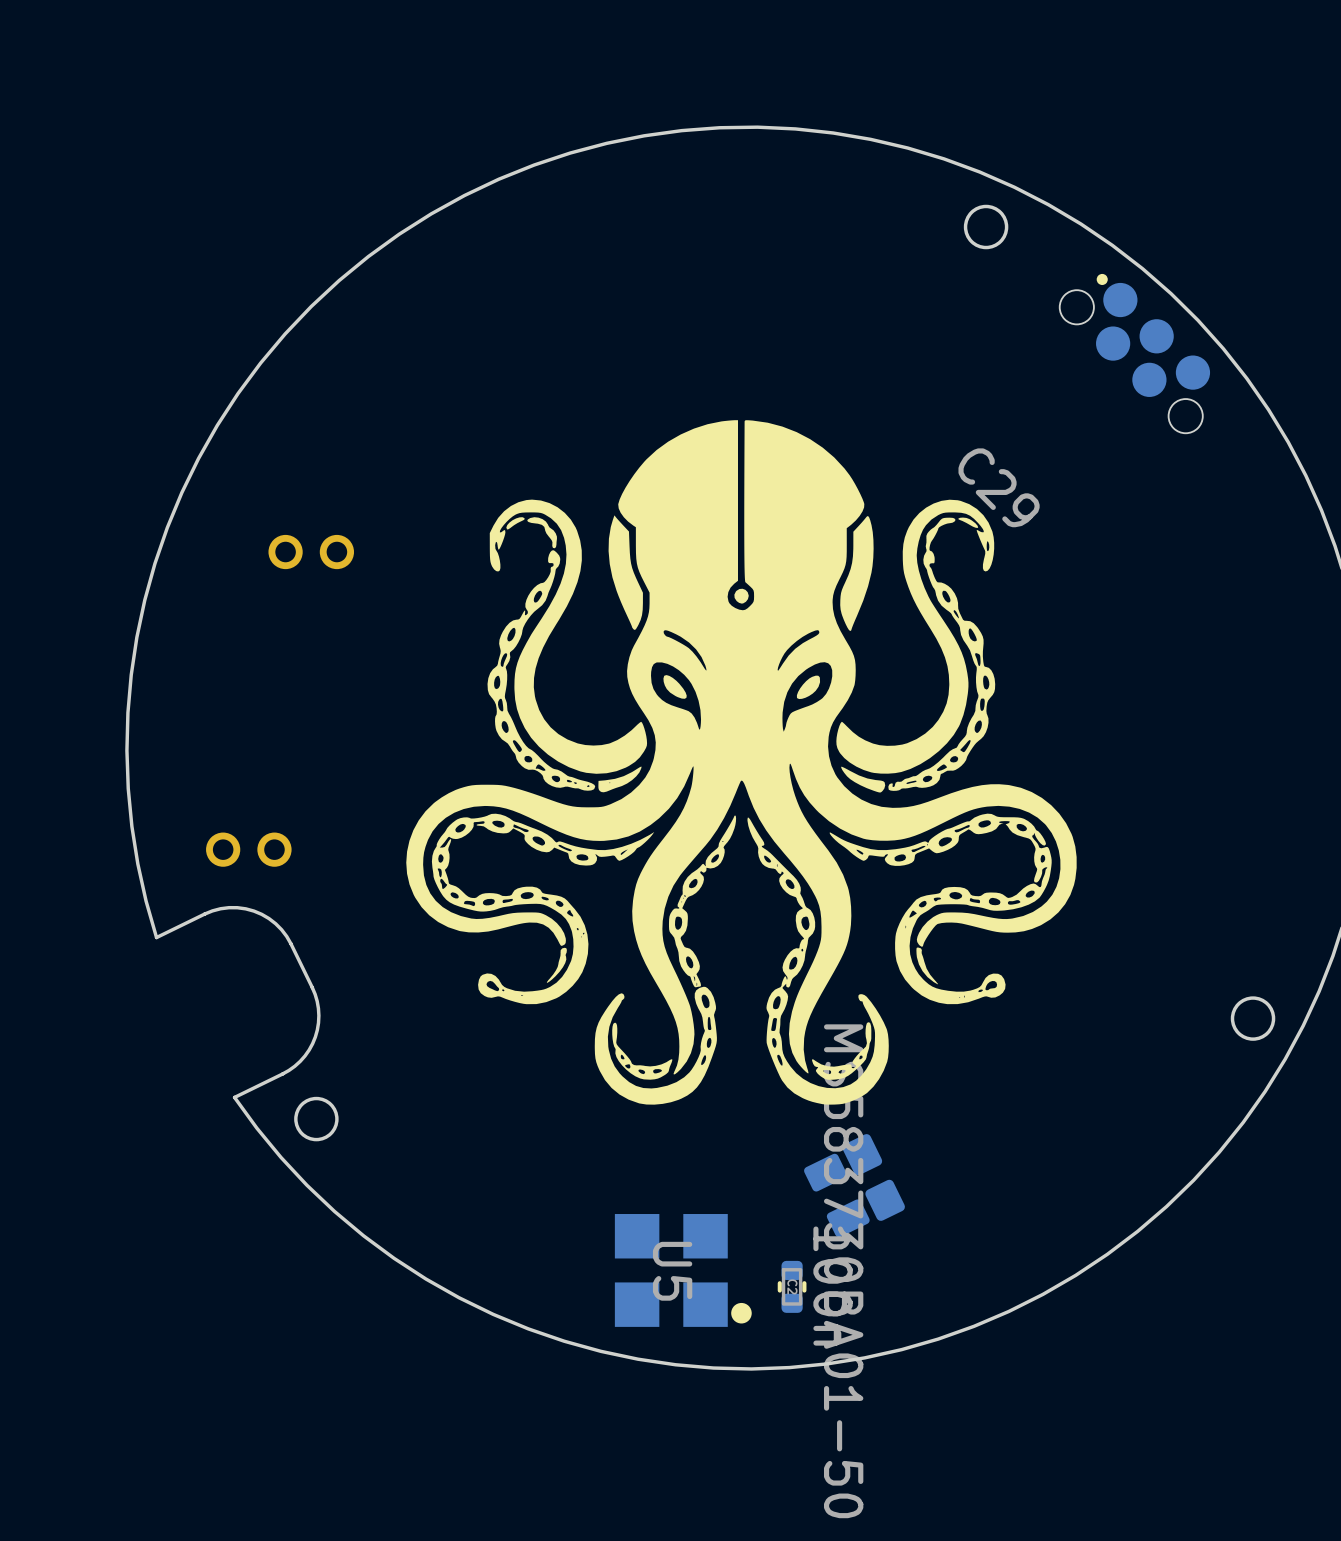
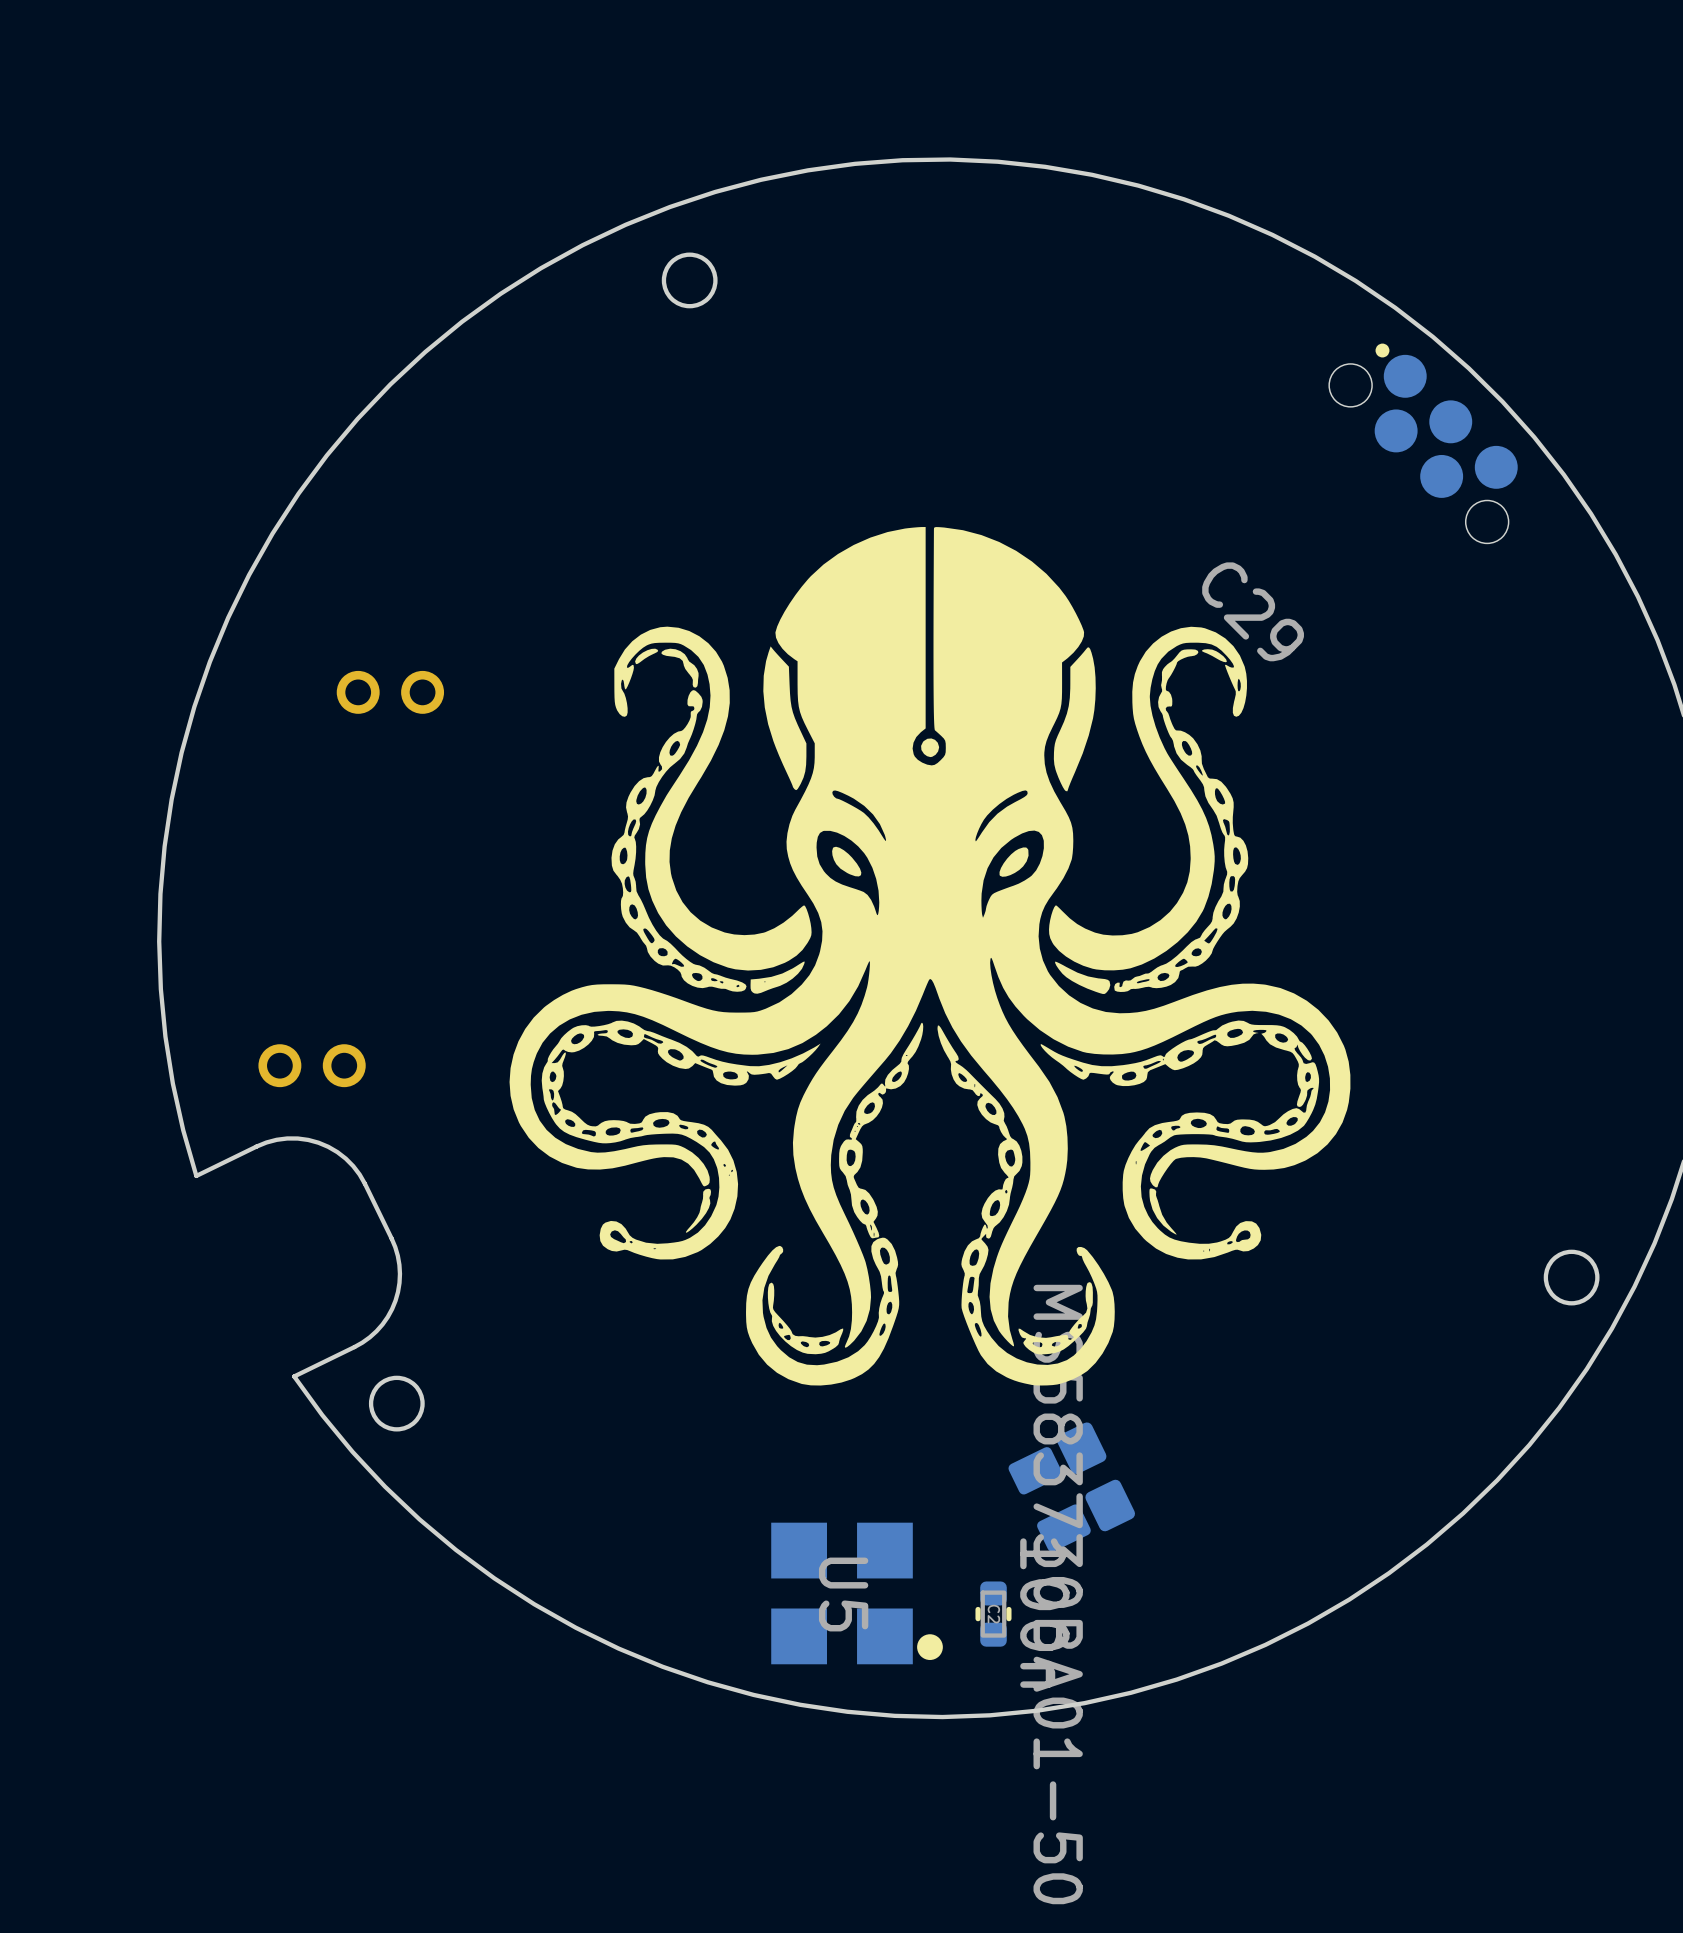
round board edge position: (986, 227) -> (689, 280)

